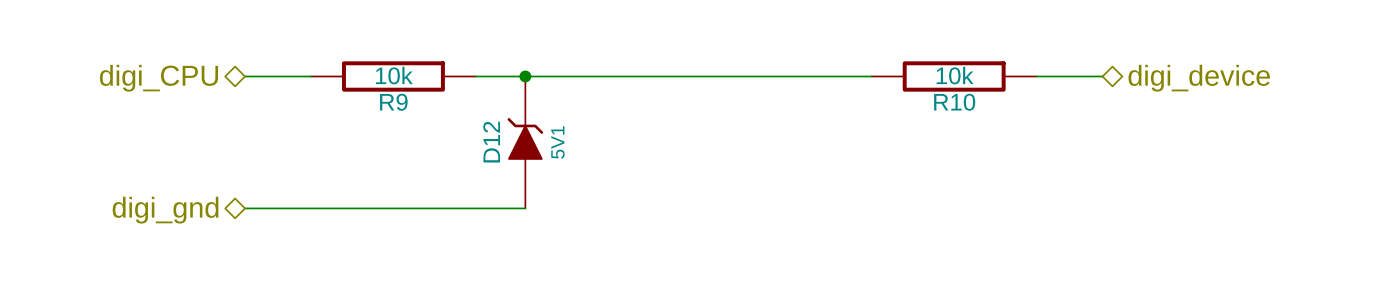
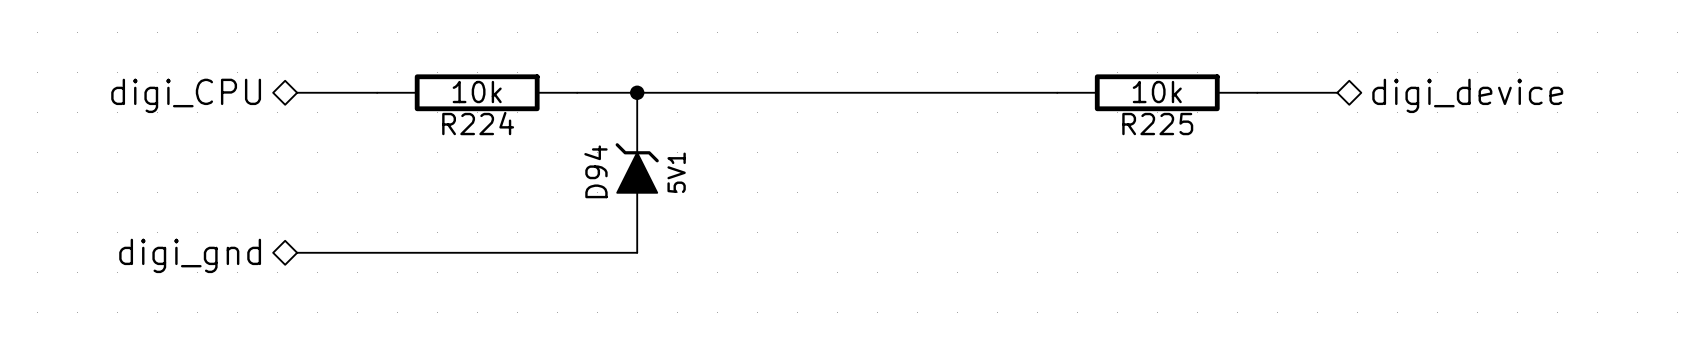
R9 name: R9 (393, 102) -> R224 (478, 123)
R10 name: R10 (954, 102) -> R225 (1157, 124)
D12 name: D12 (491, 142) -> D94 (595, 171)

